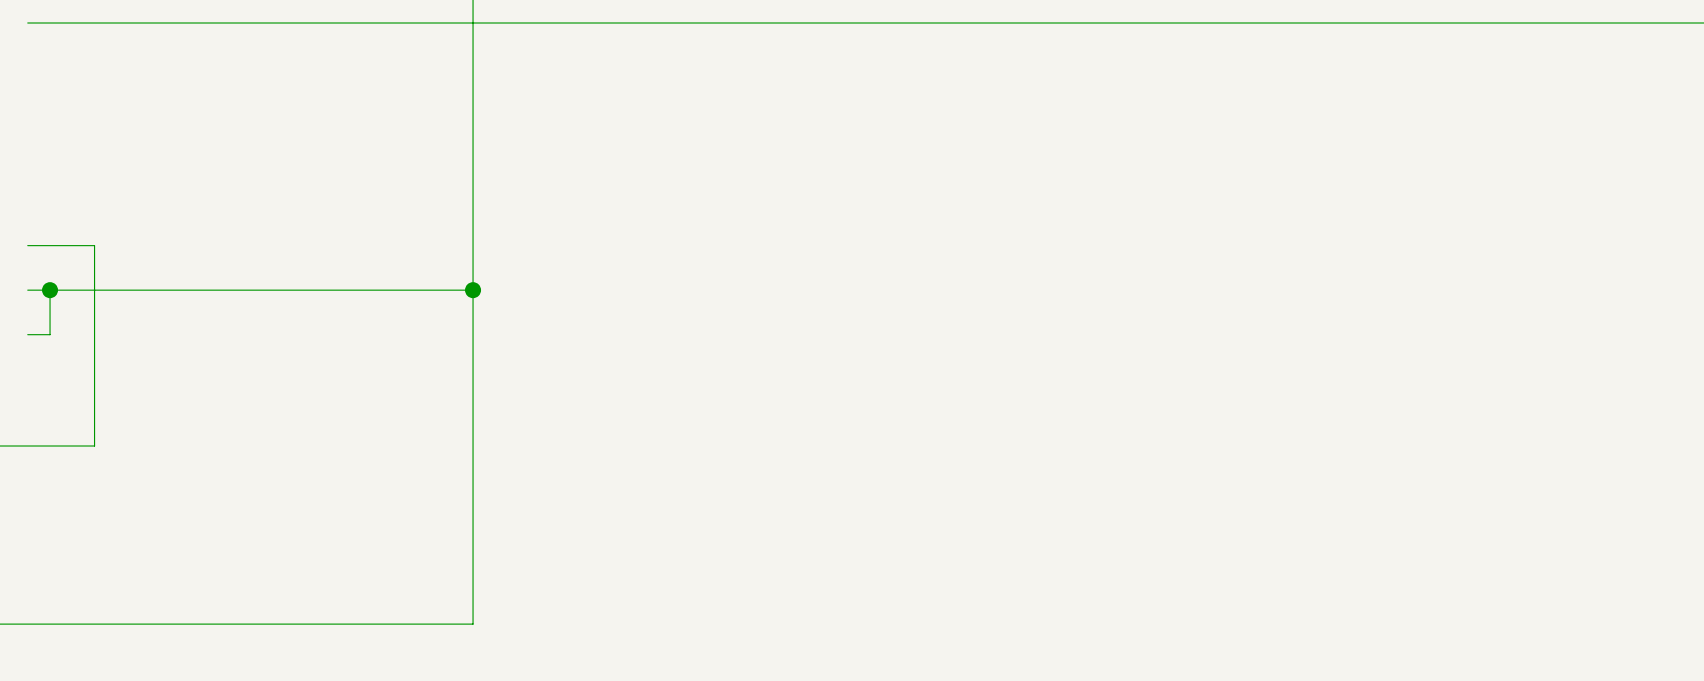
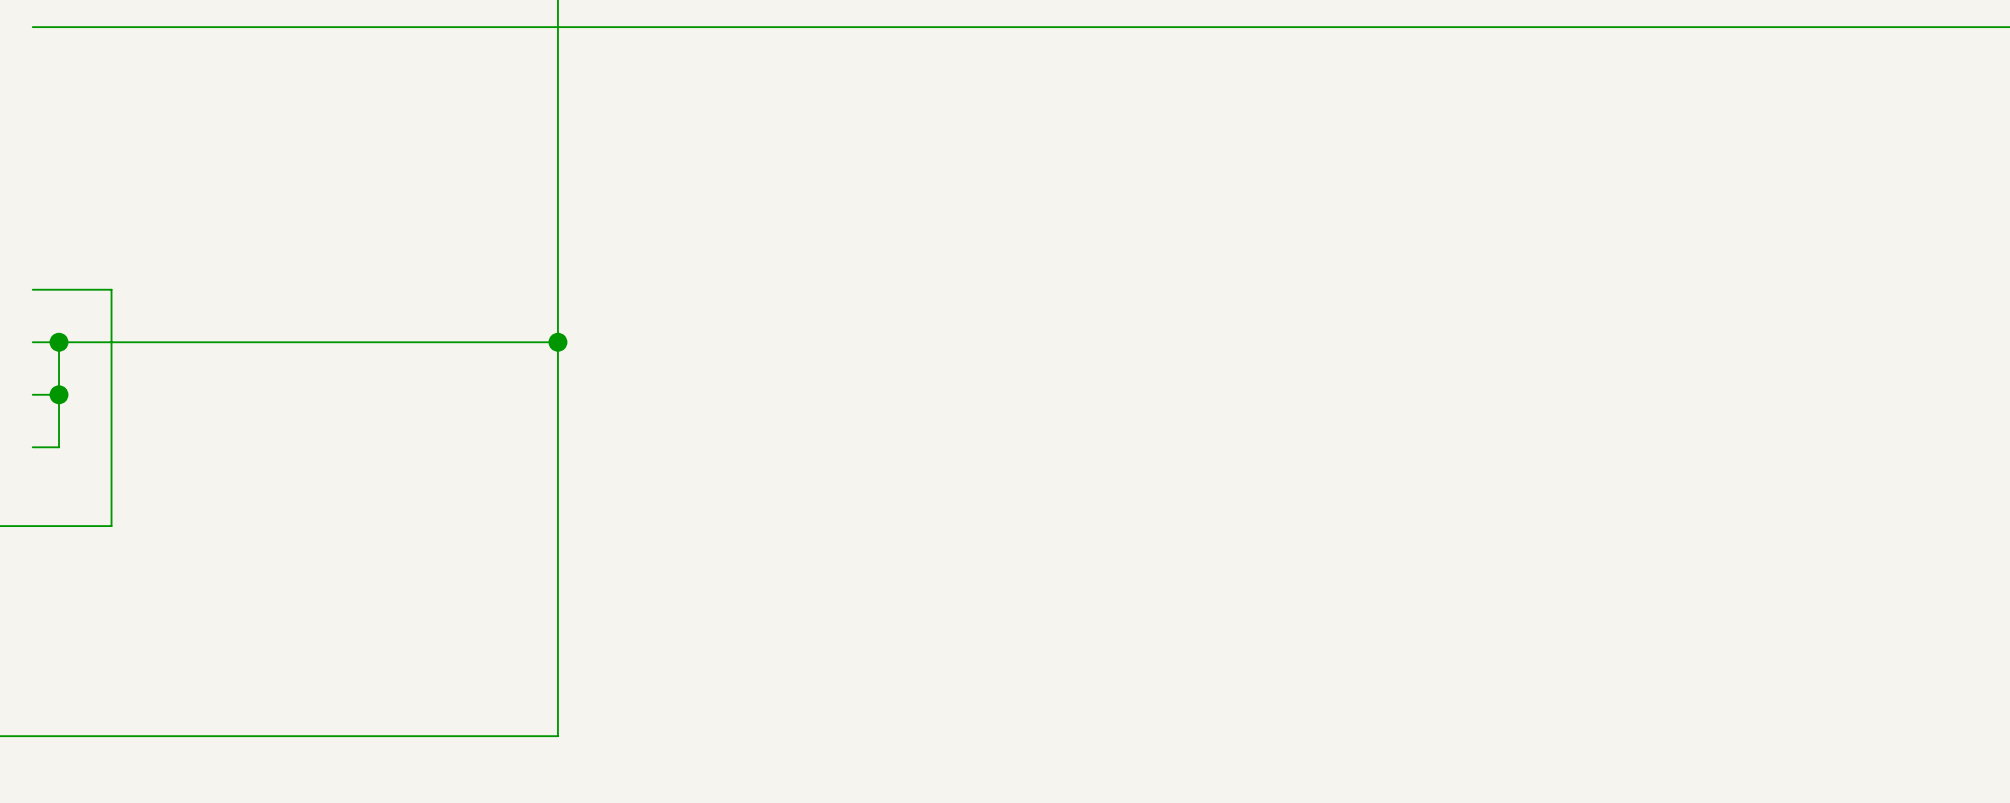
wire: none -> (59, 394) (59, 447) (32, 447)
junction: none -> (59, 394)

